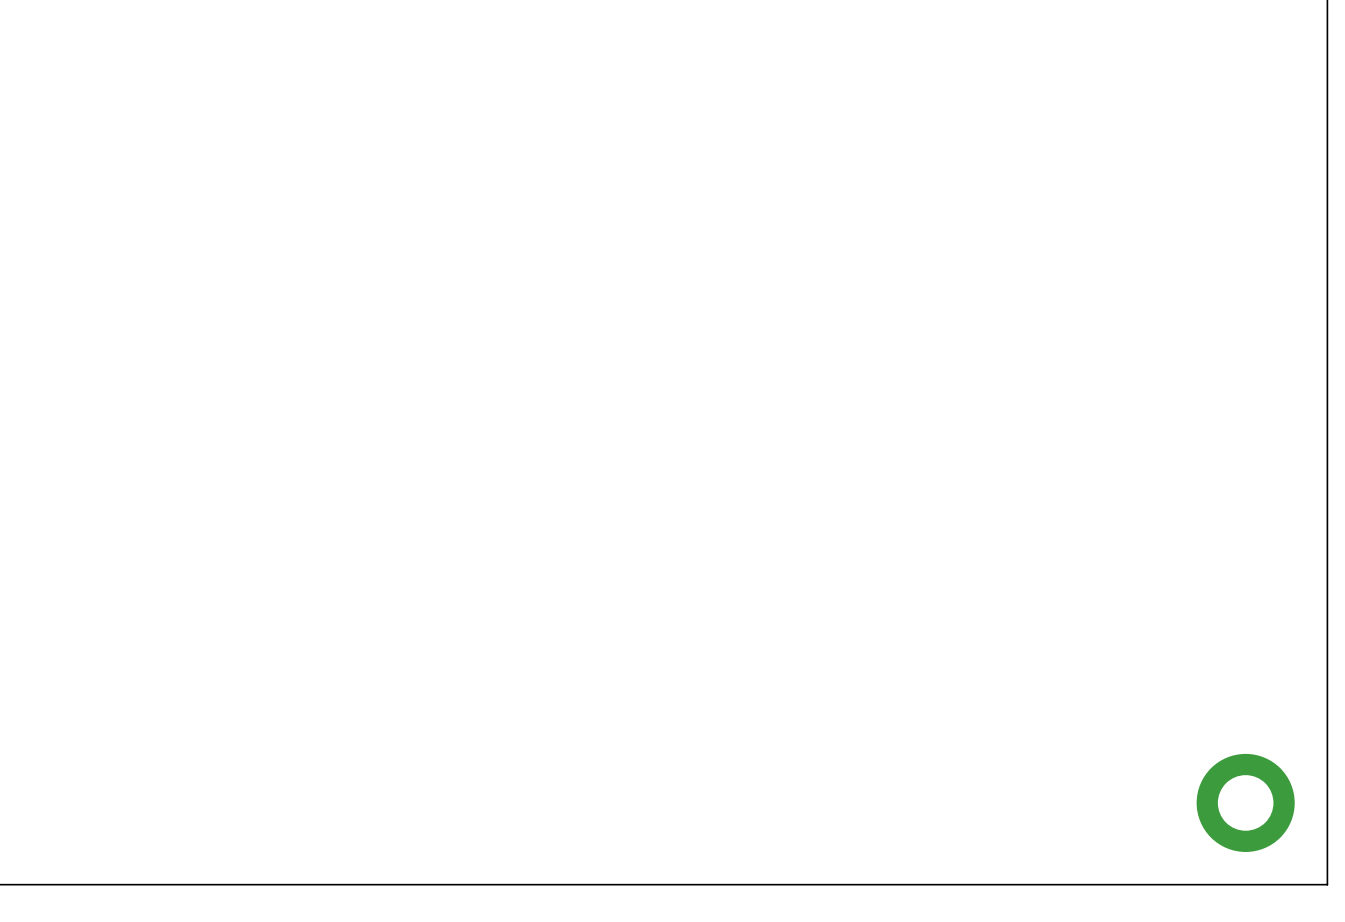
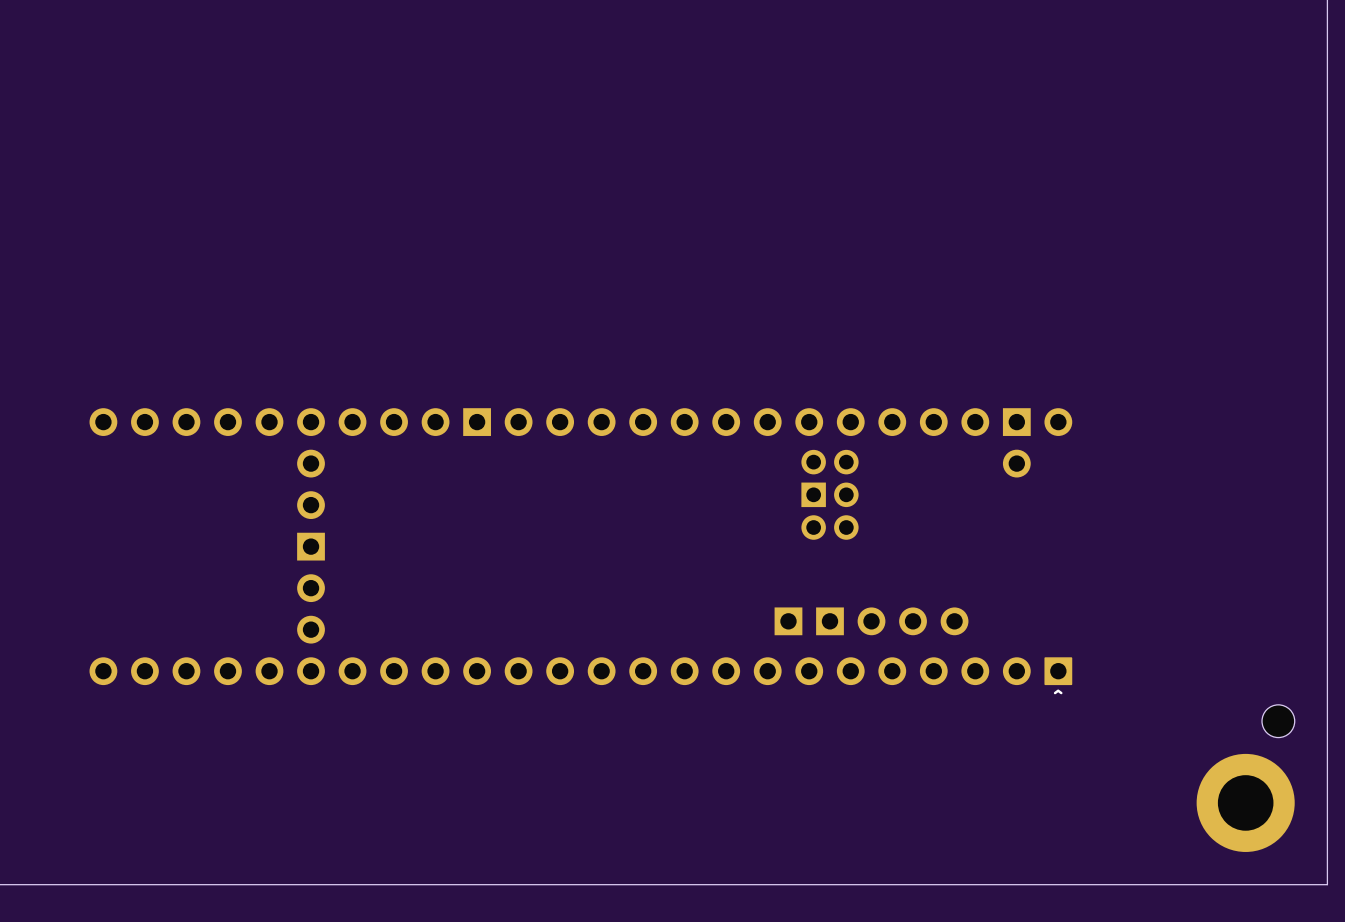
part: none -> (580, 546)
part: none -> (1278, 721)

